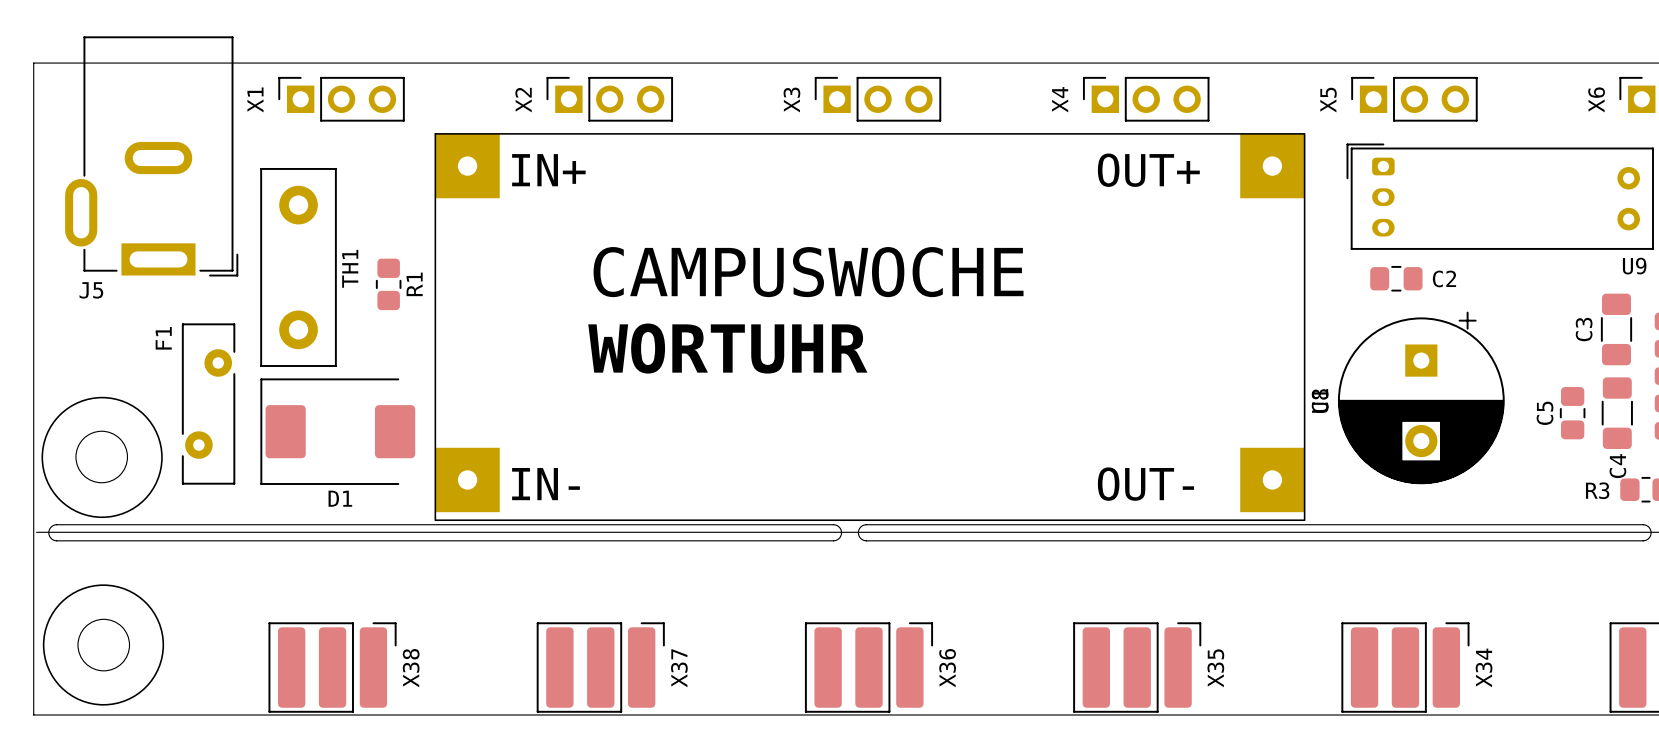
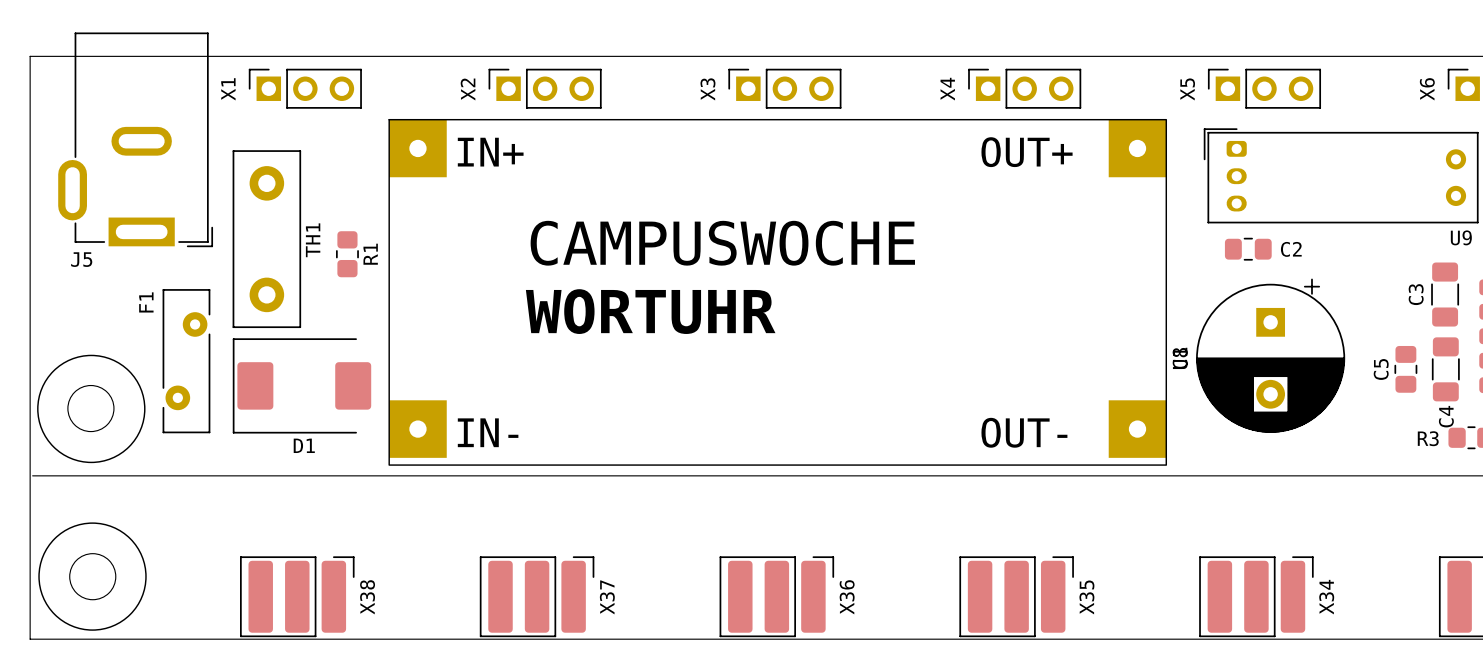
board edge: (56, 524) (833, 524) (839, 527) (841, 532) (839, 538) (833, 540) (56, 540) (51, 538) (48, 532) (51, 527) (56, 524) -> none
board edge: (866, 524) (1643, 524) (1648, 527) (1651, 532) (1648, 538) (1643, 540) (866, 540) (860, 538) (858, 532) (860, 527) (866, 524) -> none

